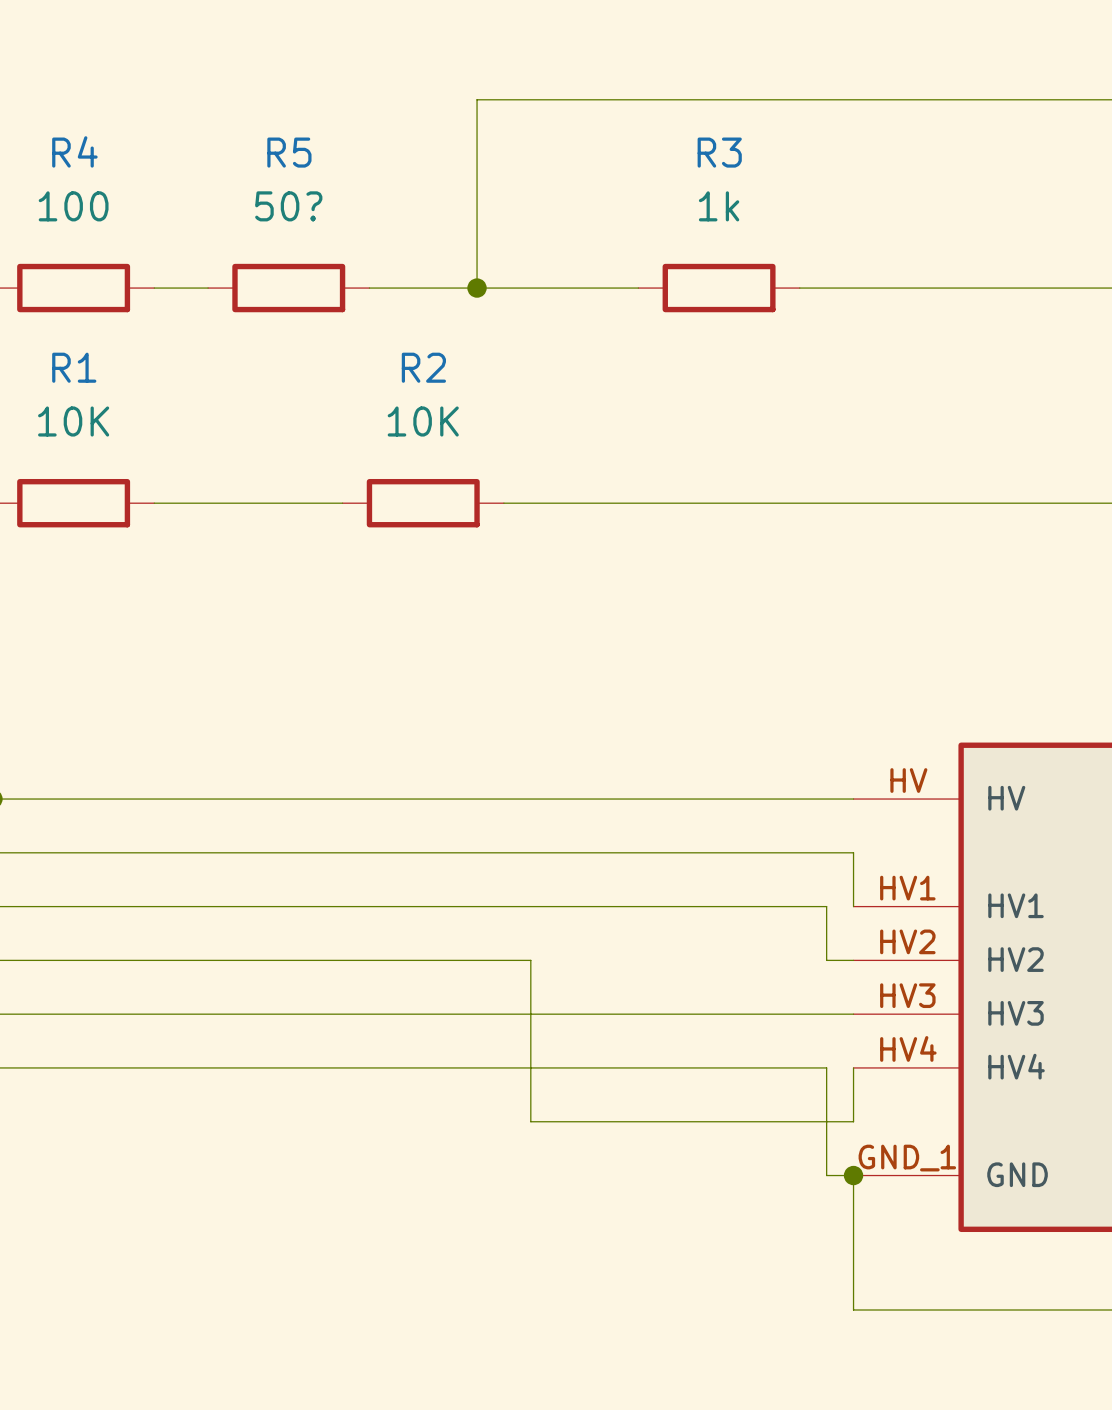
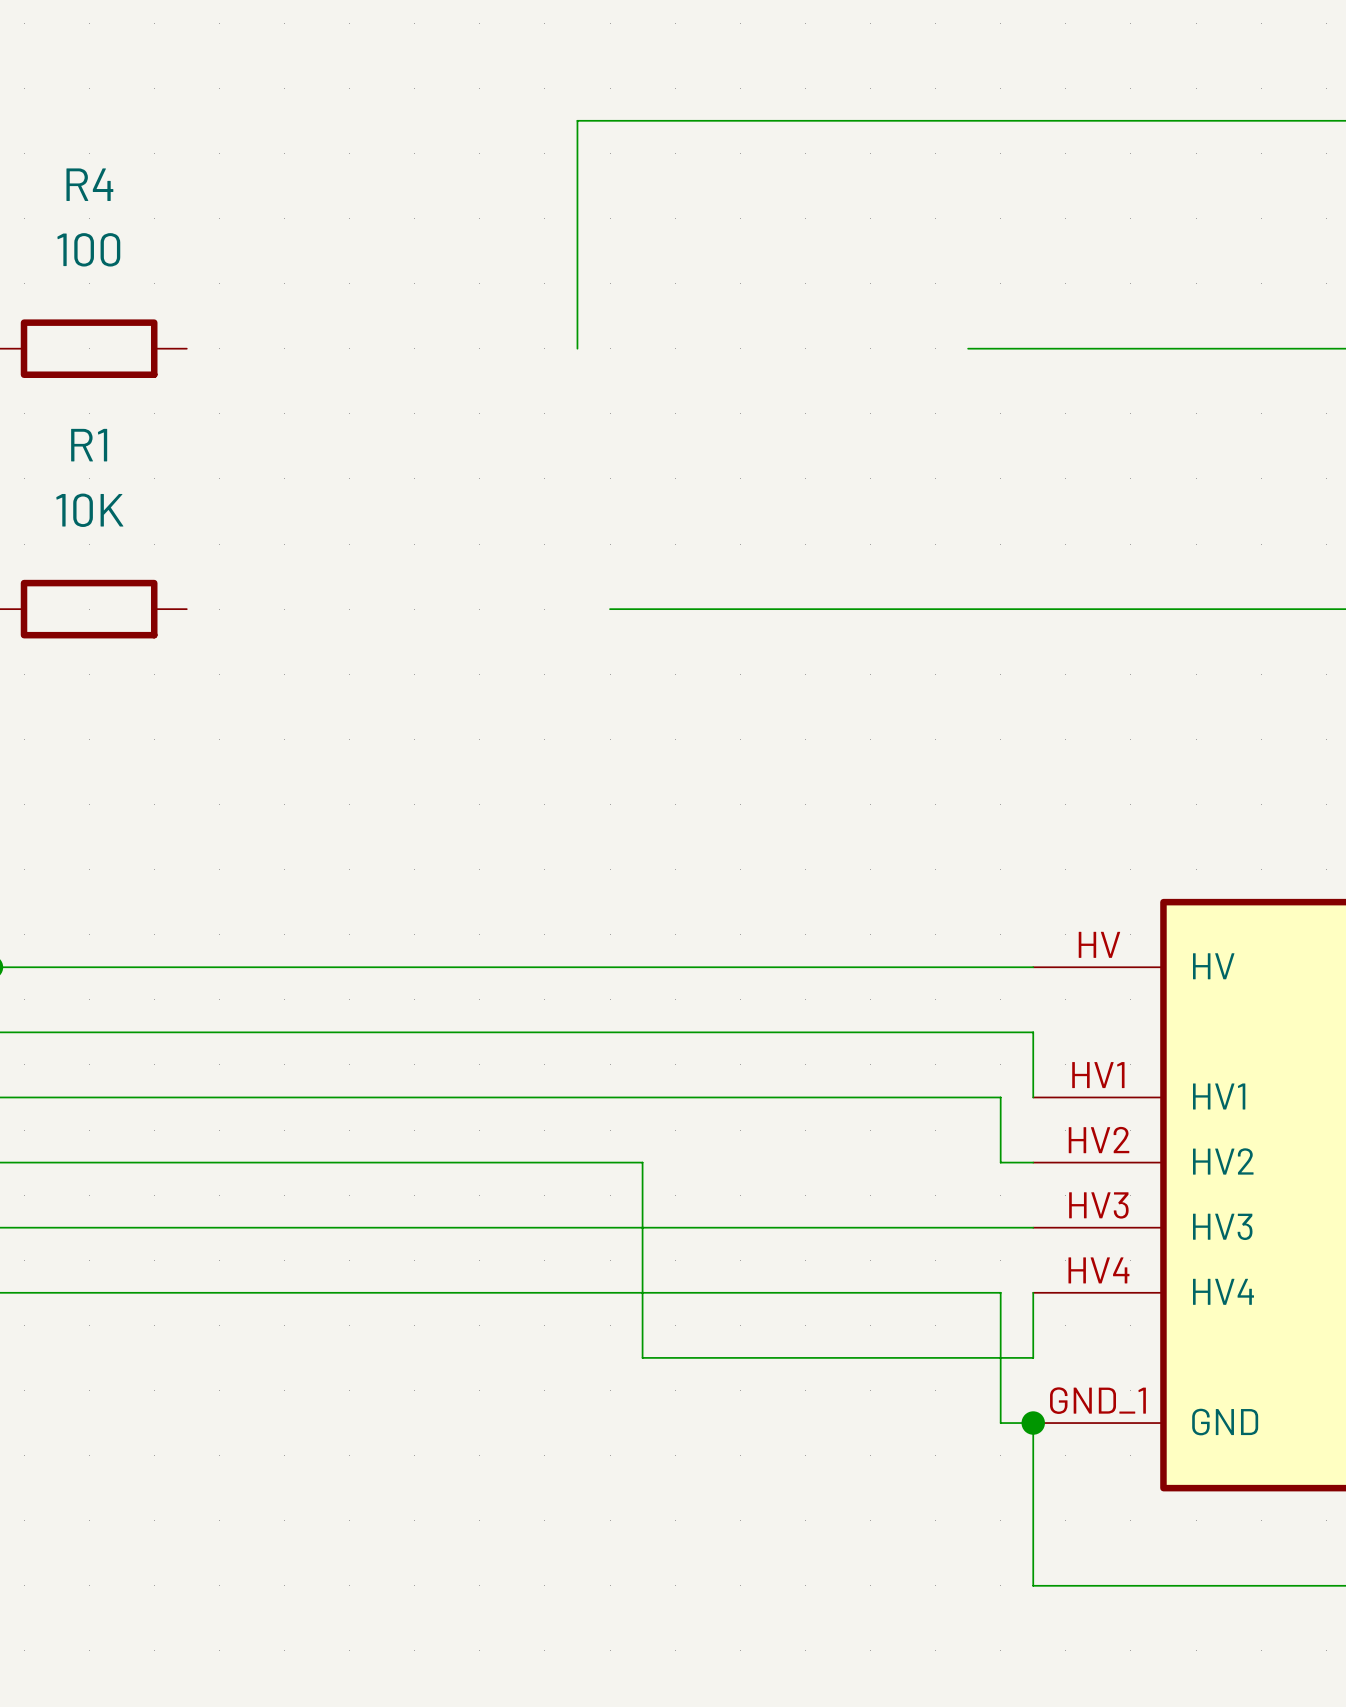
wire: (154, 288) (208, 288) -> none
R5: 50? (288, 288) -> none
wire: (369, 288) (638, 288) -> none
junction: (477, 288) -> none
R3: 1k (719, 288) -> none
wire: (154, 503) (342, 503) -> none
R2: 10K (423, 503) -> none

